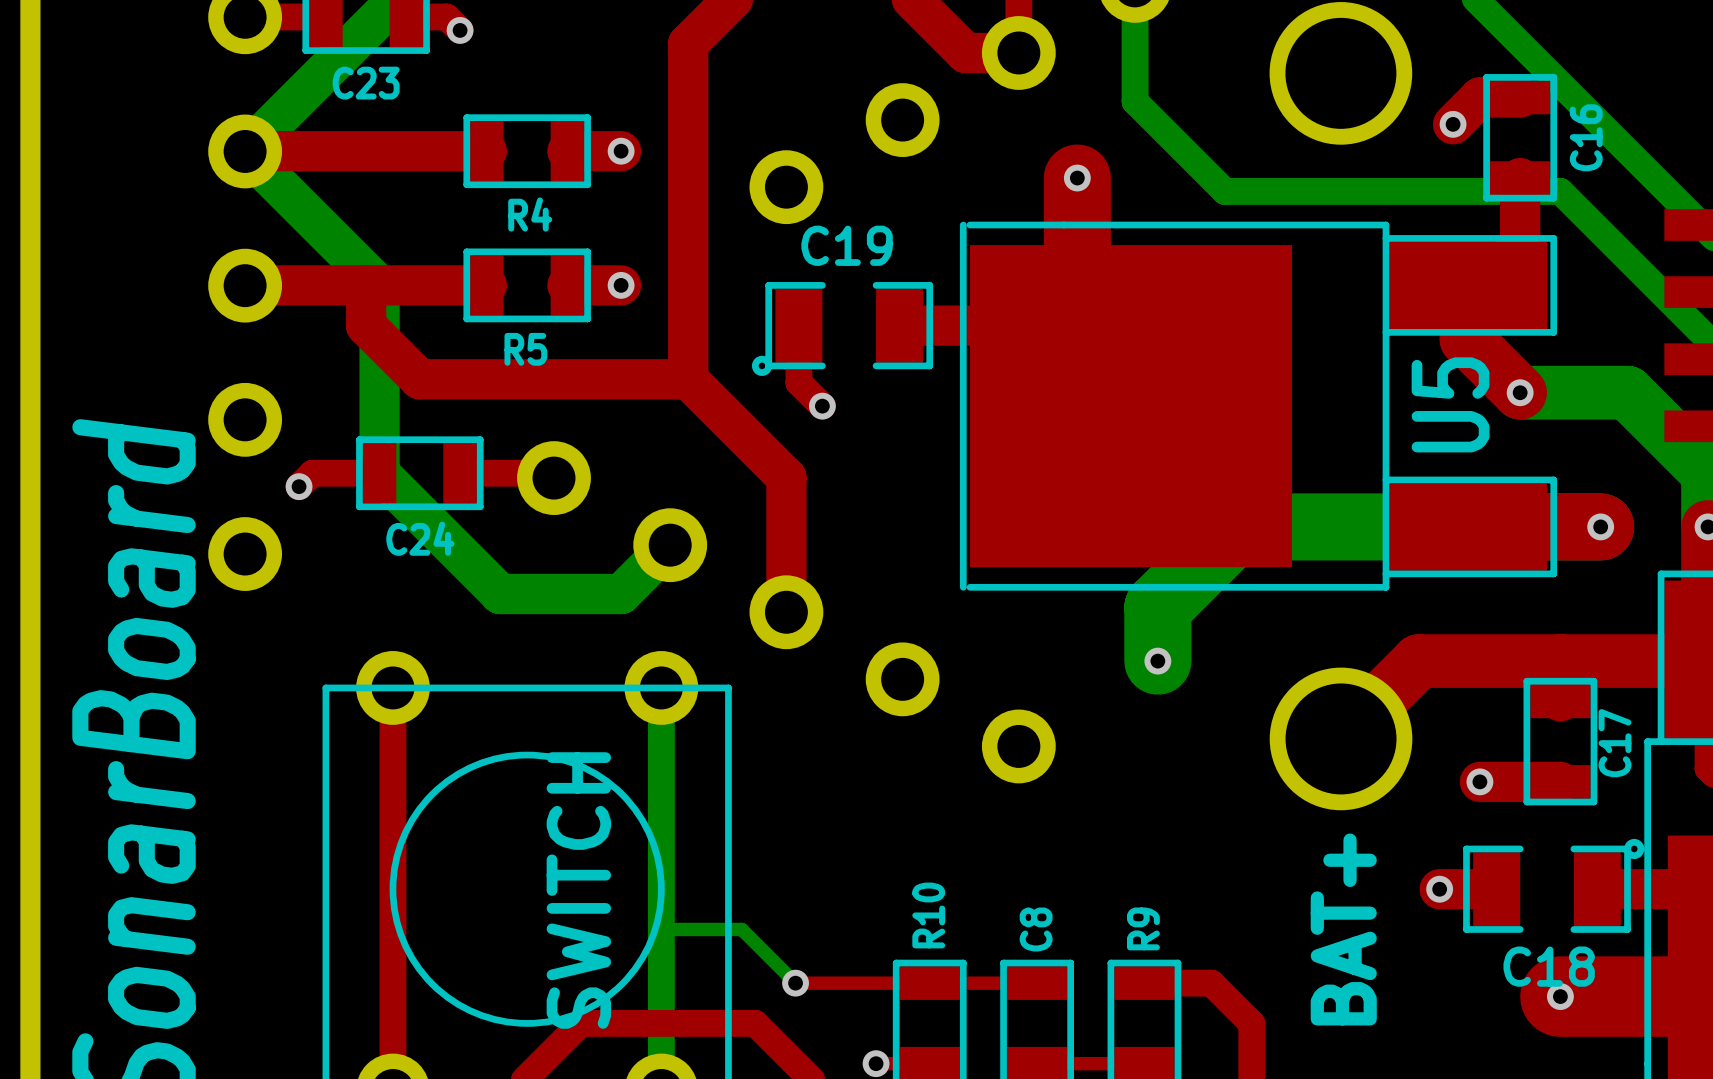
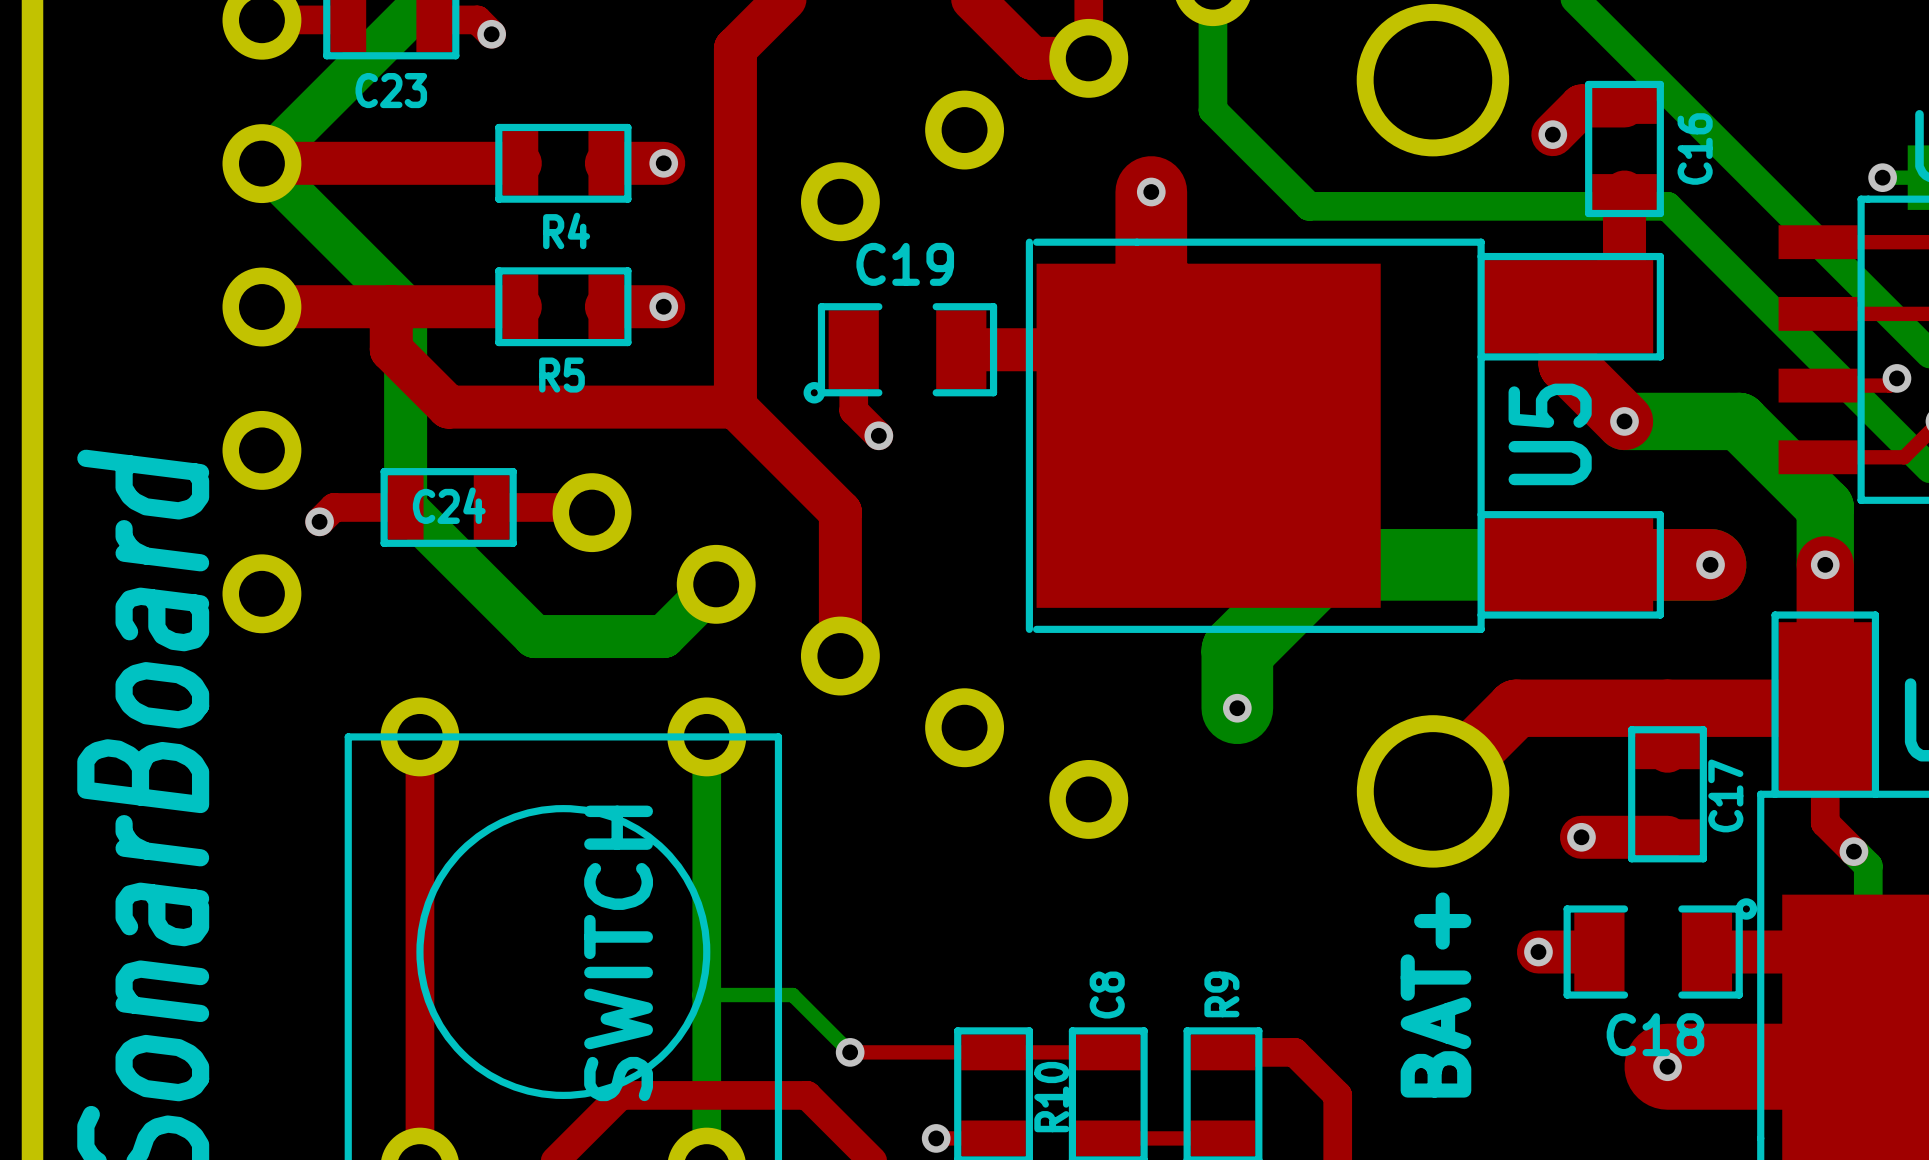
C24 name position: C24 (420, 538) -> C24 (449, 505)
R10 name position: R10 (928, 915) -> R10 (1051, 1097)

